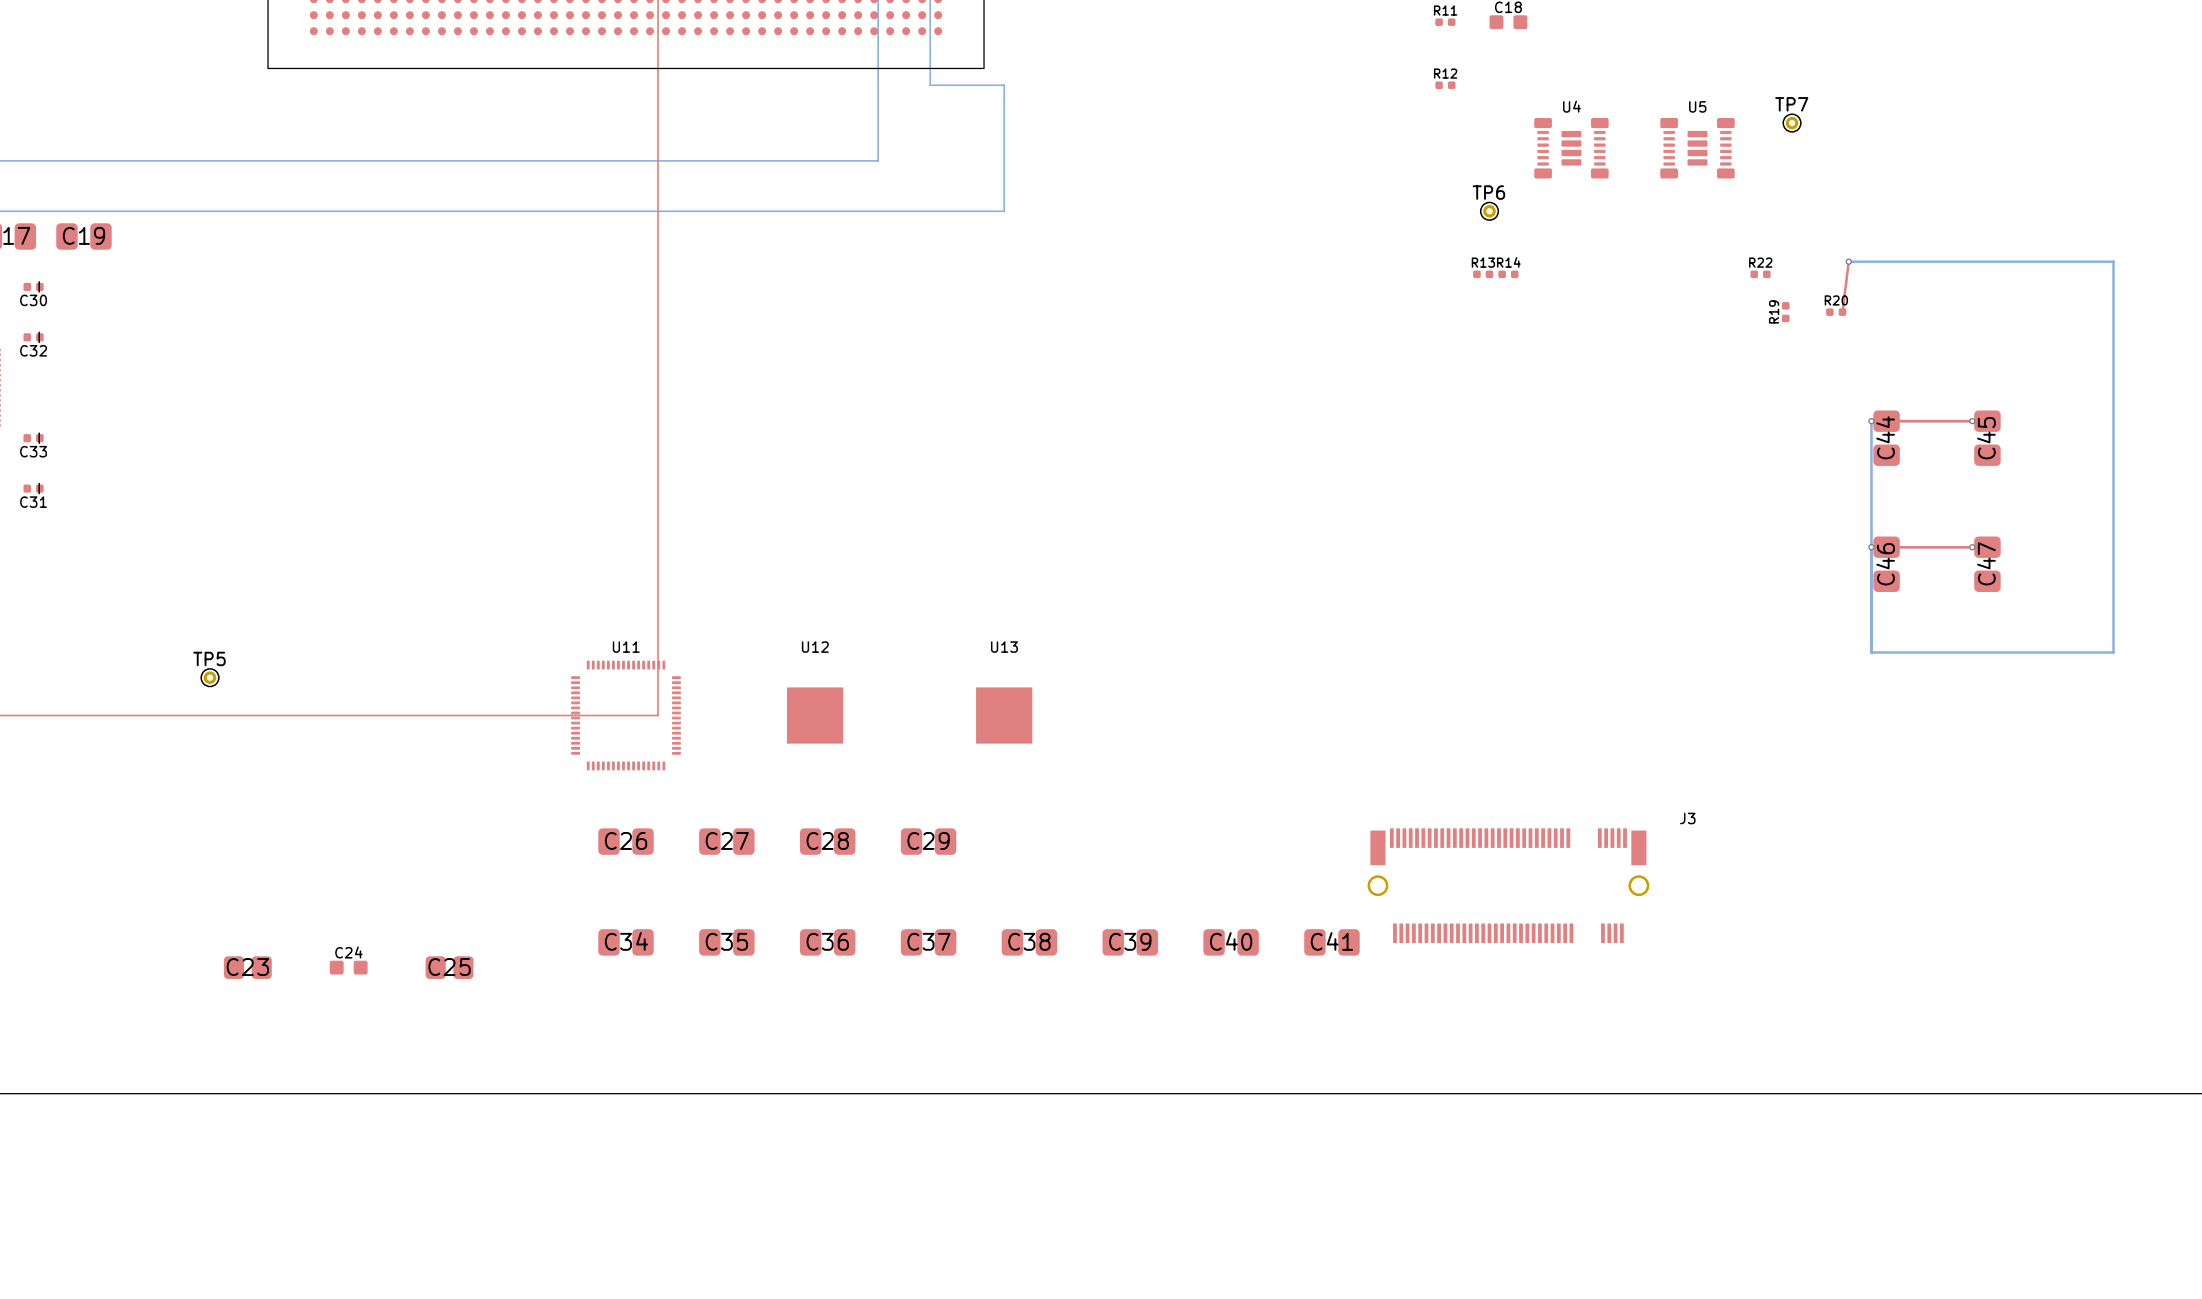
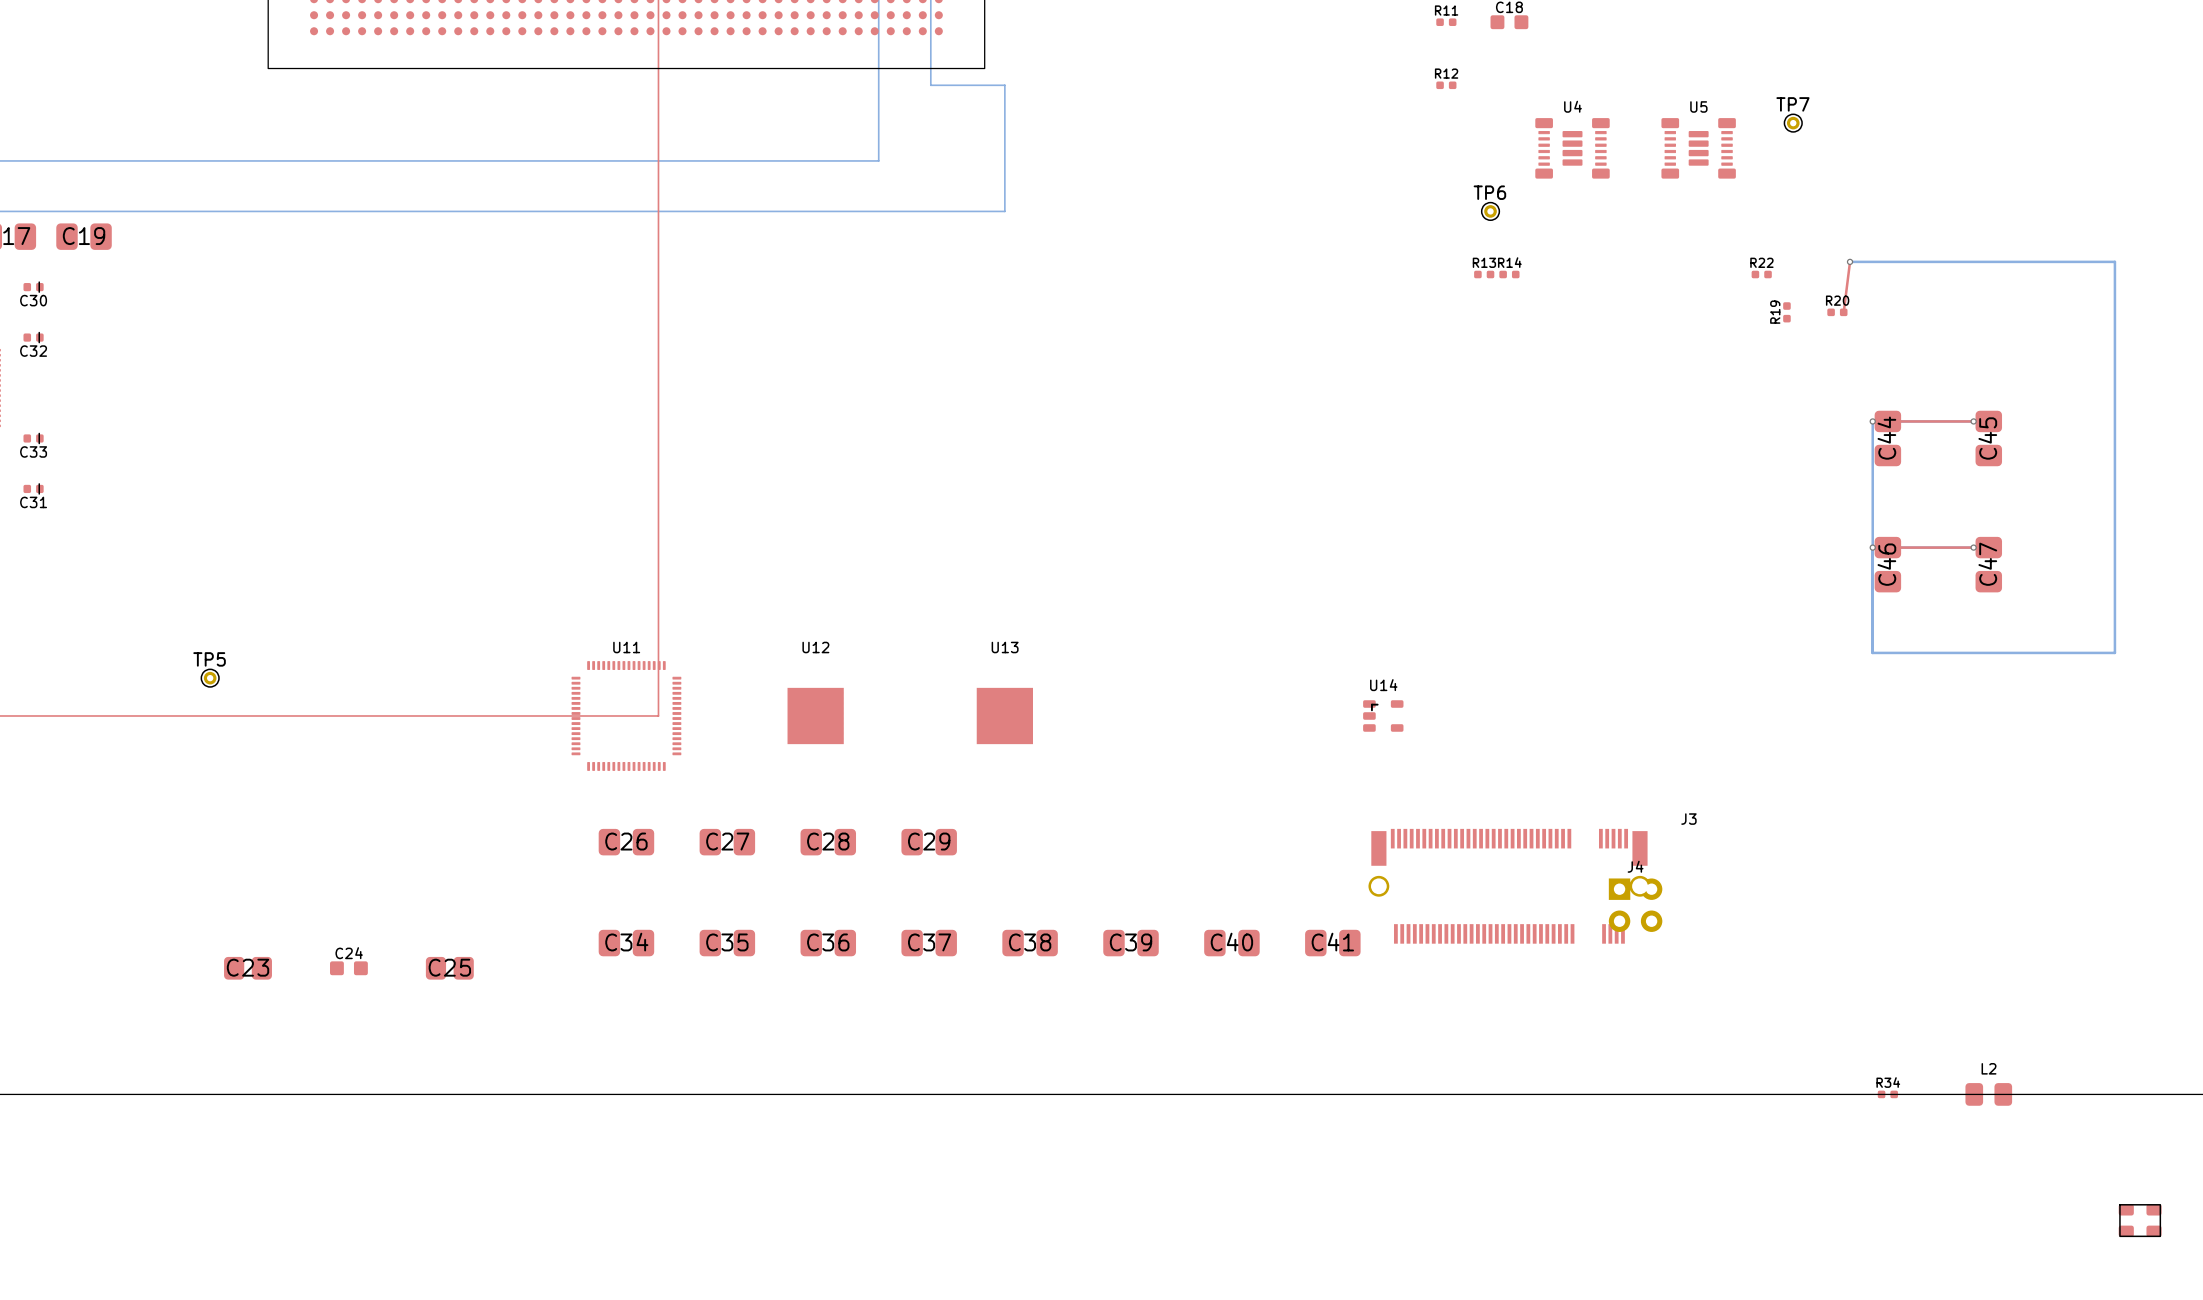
U14: none -> (1383, 715)
J4: none -> (1635, 905)
R34: none -> (1887, 1094)
L2: none -> (1988, 1094)
part: none -> (2140, 1220)

